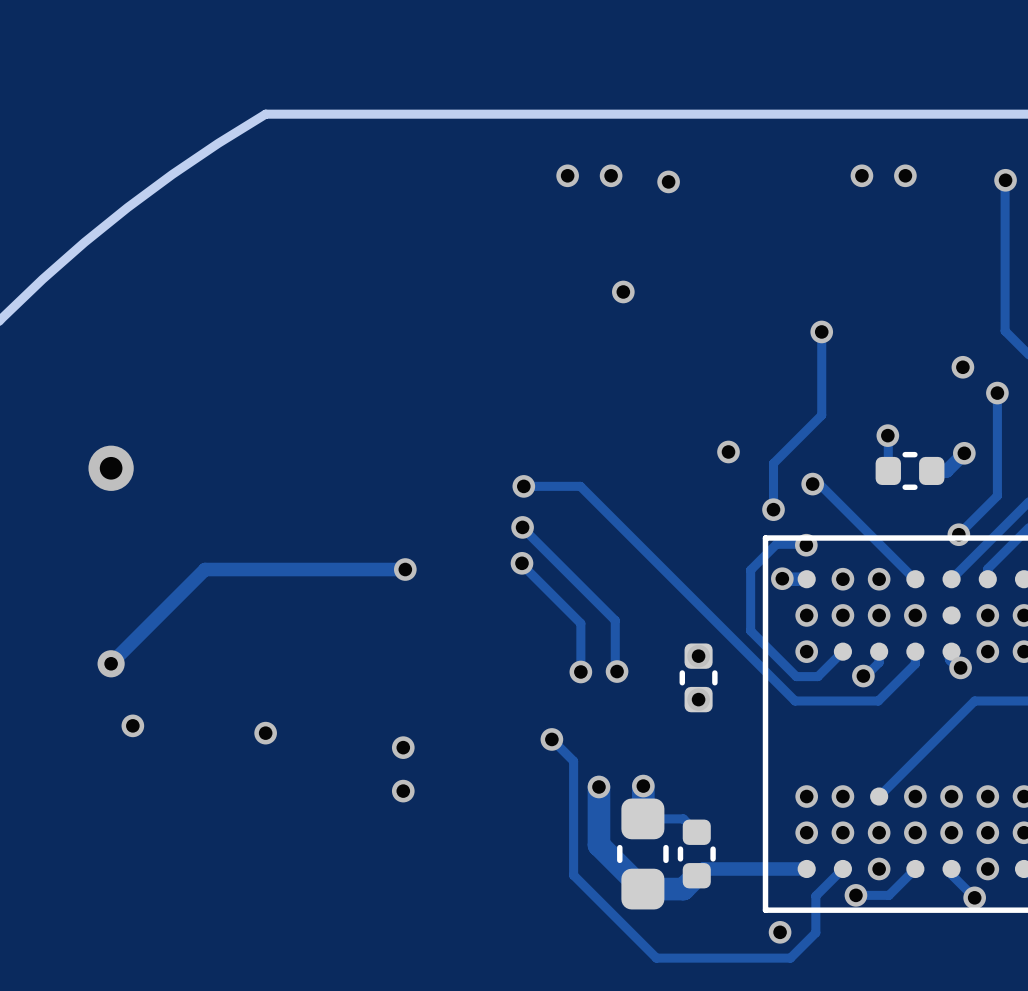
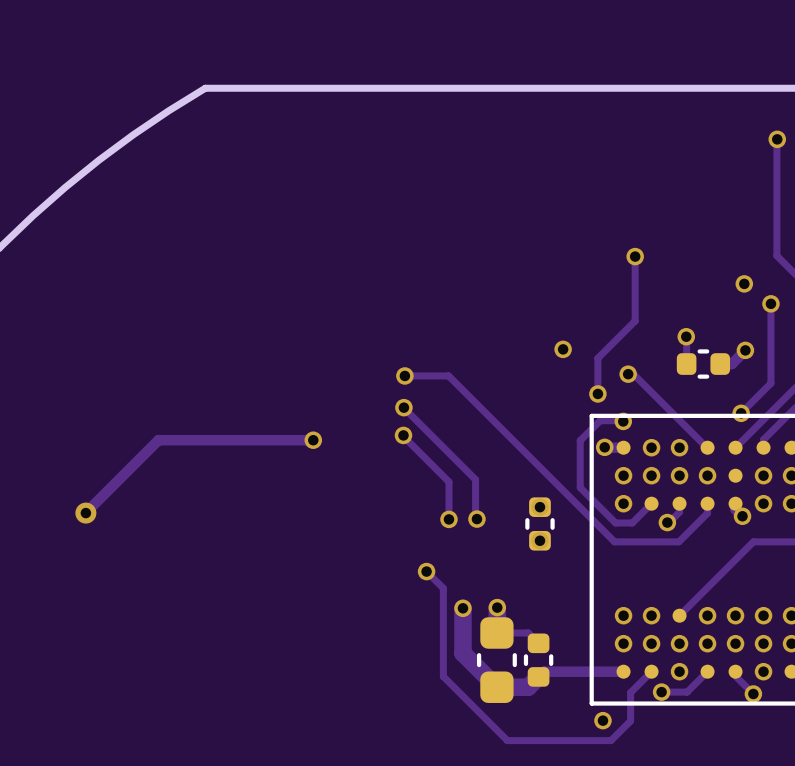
via: (567, 175) -> none
via: (611, 175) -> none
via: (861, 175) -> none
via: (905, 175) -> none
via: (668, 181) -> none
via: (623, 291) -> none
via: (111, 468) -> none
via: (132, 725) -> none
via: (265, 733) -> none
via: (403, 747) -> none
via: (403, 791) -> none

